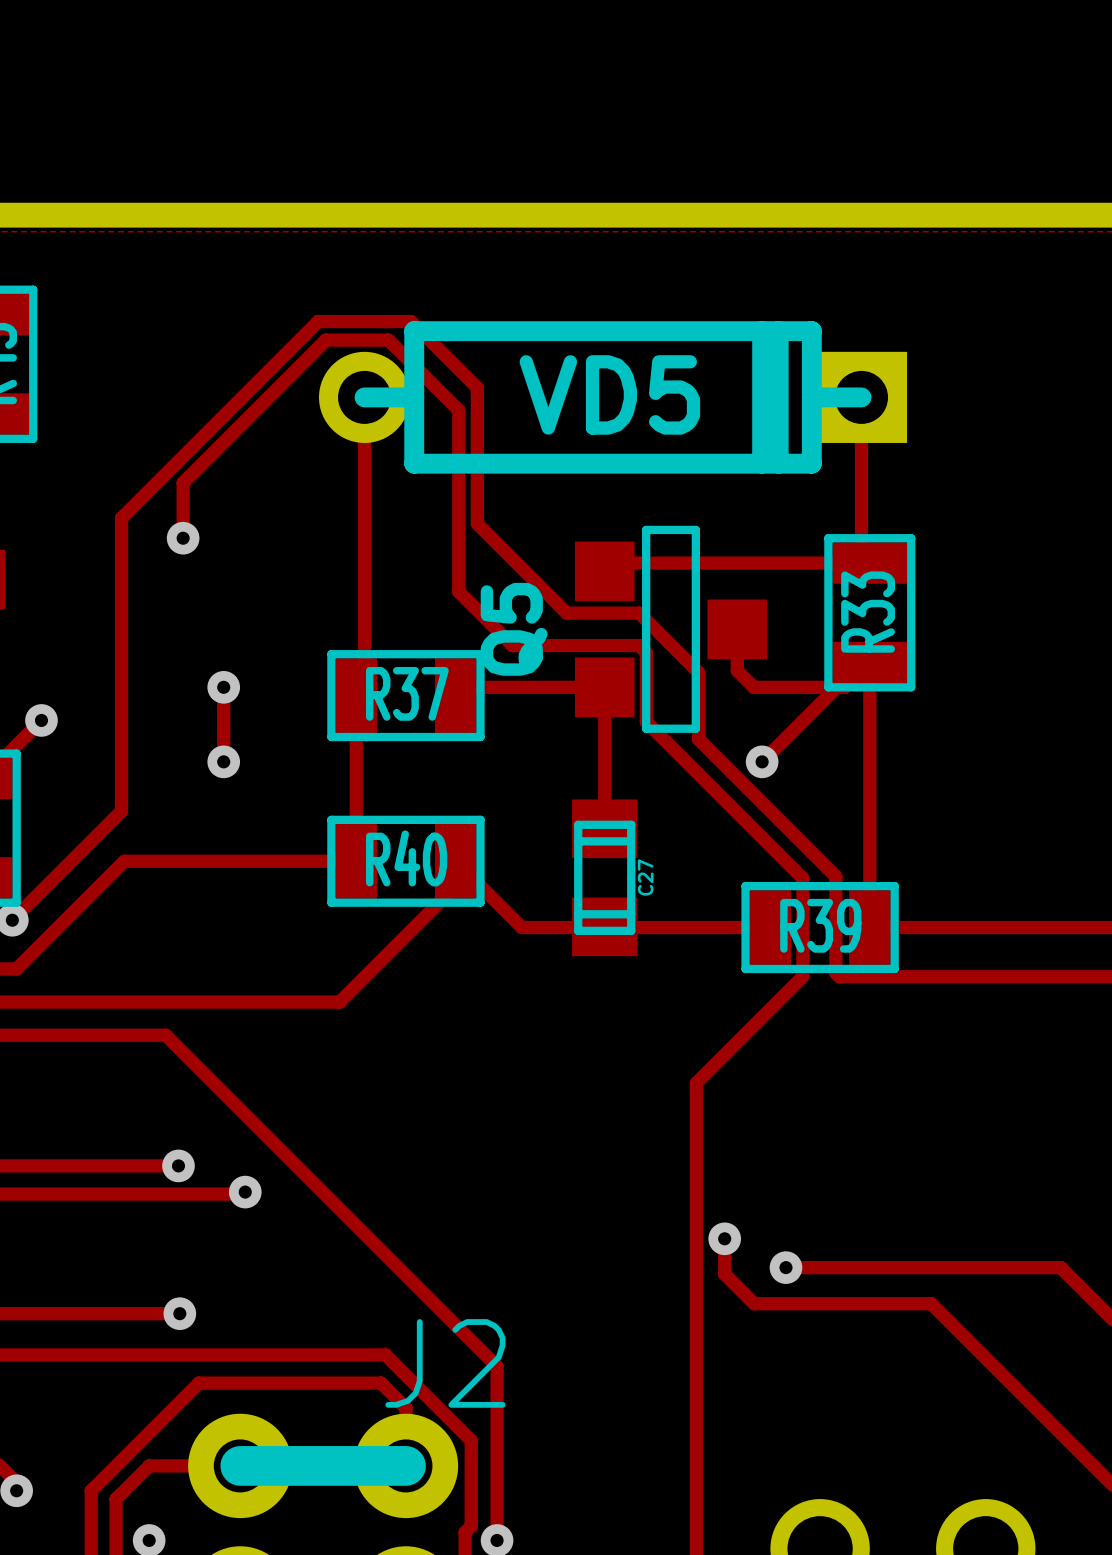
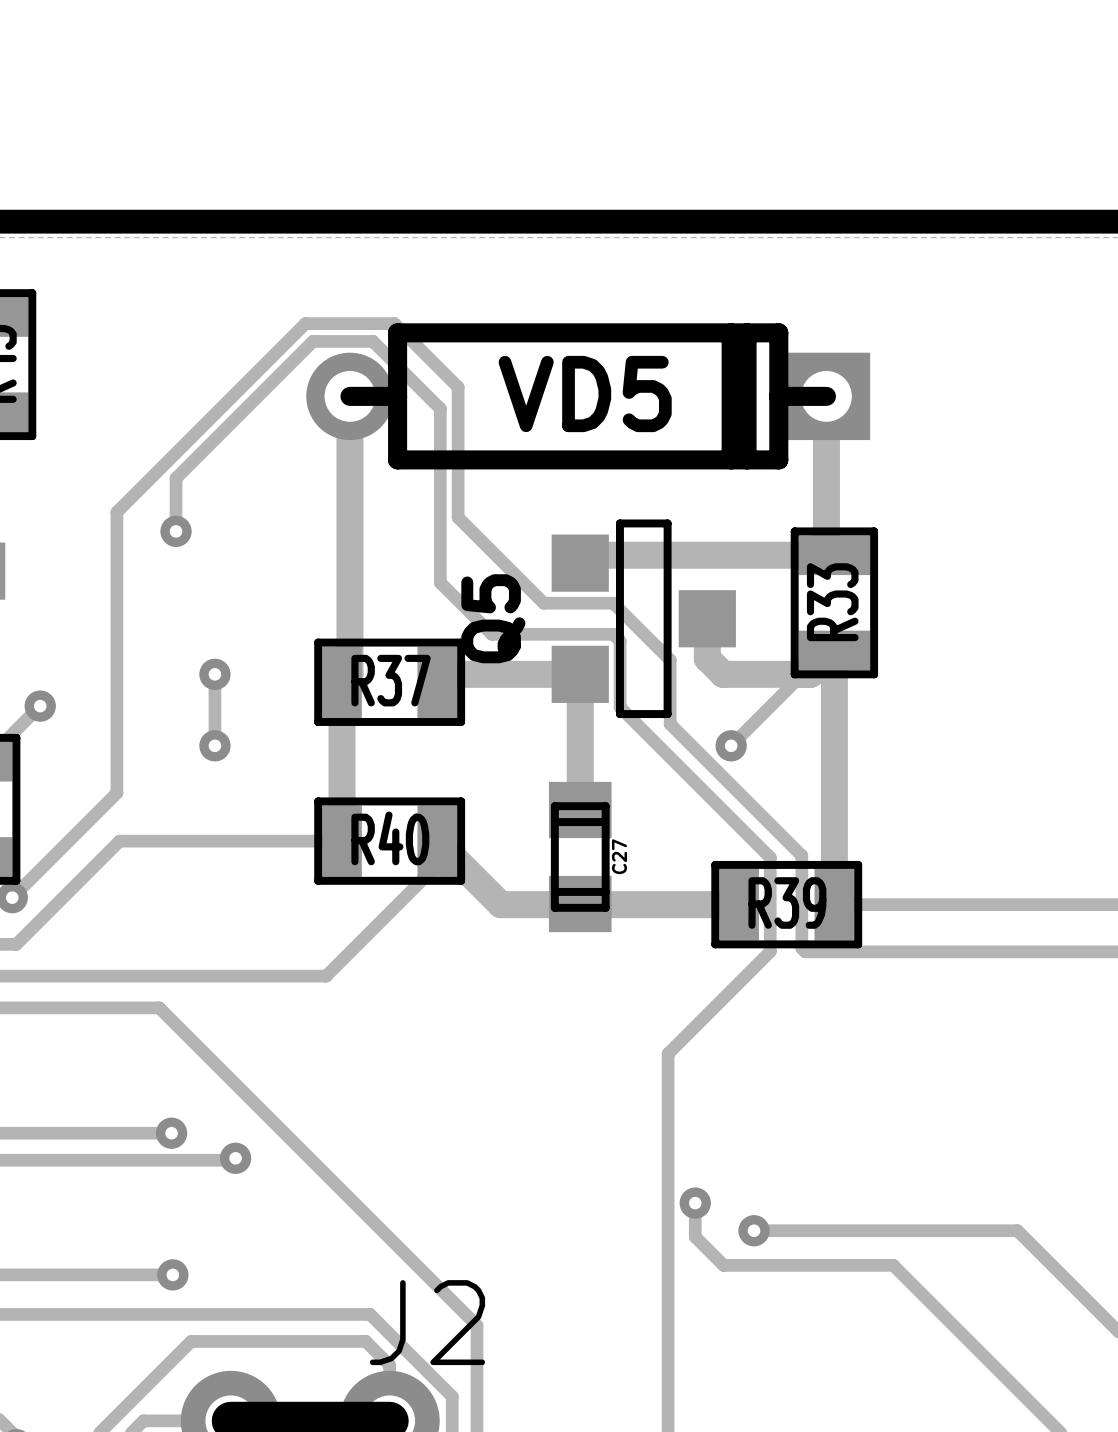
track width: thin (364, 397) (364, 687) (356, 695) (356, 861) -> thick (349, 396) (349, 674) (342, 682) (342, 841)
track width: thin (861, 397) (861, 554) (869, 563) (613, 563) (604, 571) -> thick (826, 396) (826, 547) (834, 555) (588, 555) (580, 563)
track width: thin (737, 629) (737, 670) (753, 687) (844, 687) (869, 662) (869, 927) -> thick (707, 618) (707, 658) (723, 674) (810, 674) (834, 650) (834, 904)
track width: thin (455, 695) (463, 687) (604, 687) (604, 828) -> thick (437, 682) (445, 674) (580, 674) (580, 809)
track width: thin (455, 861) (521, 927) (604, 927) -> thick (437, 841) (500, 904) (579, 904)
track width: thin (605, 927) (770, 927) -> thick (580, 904) (739, 904)

